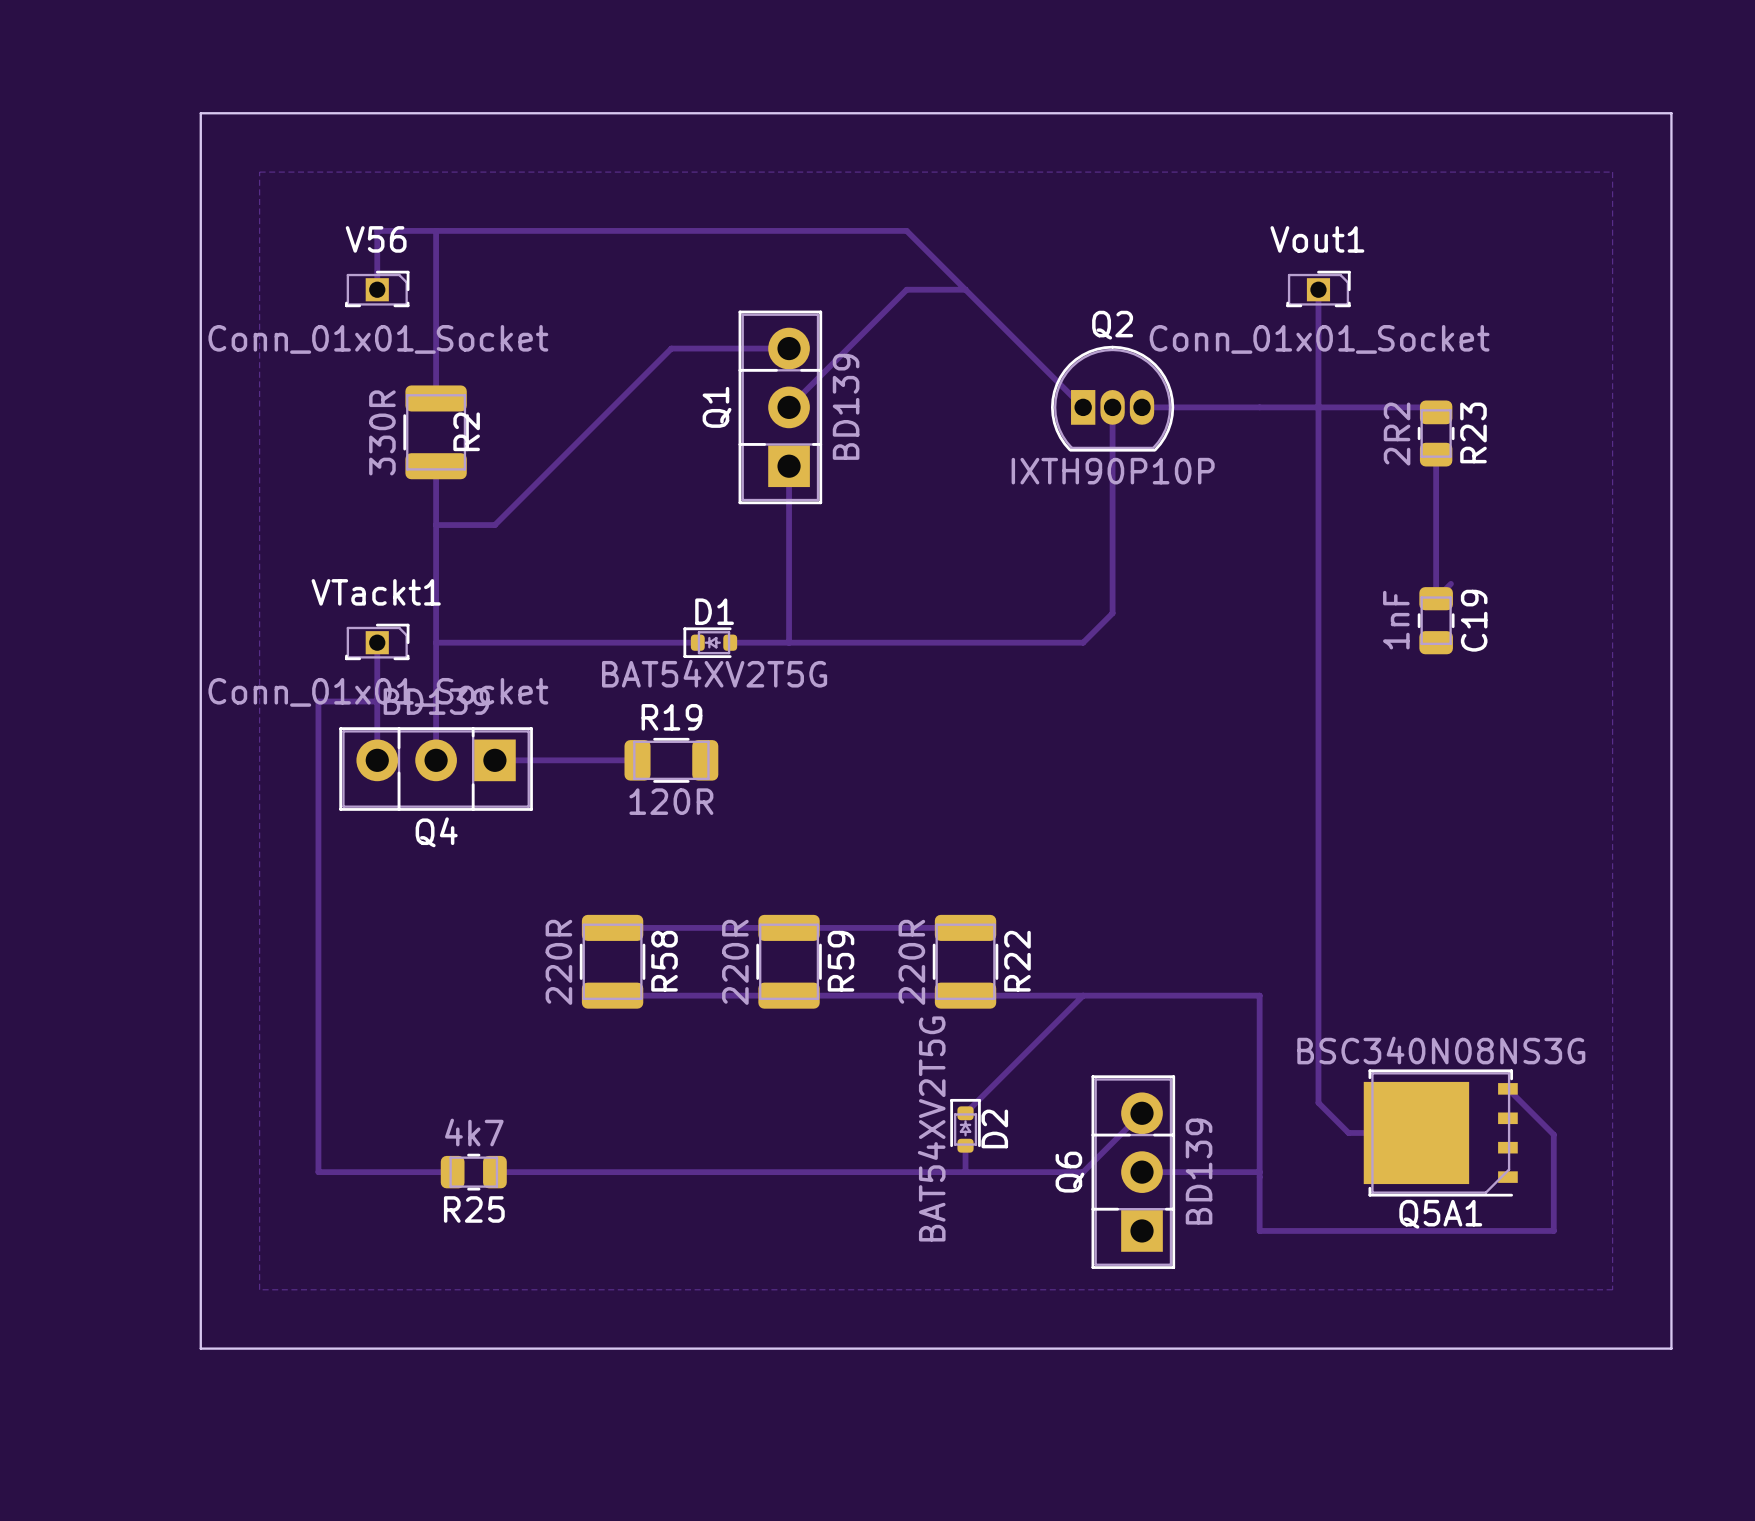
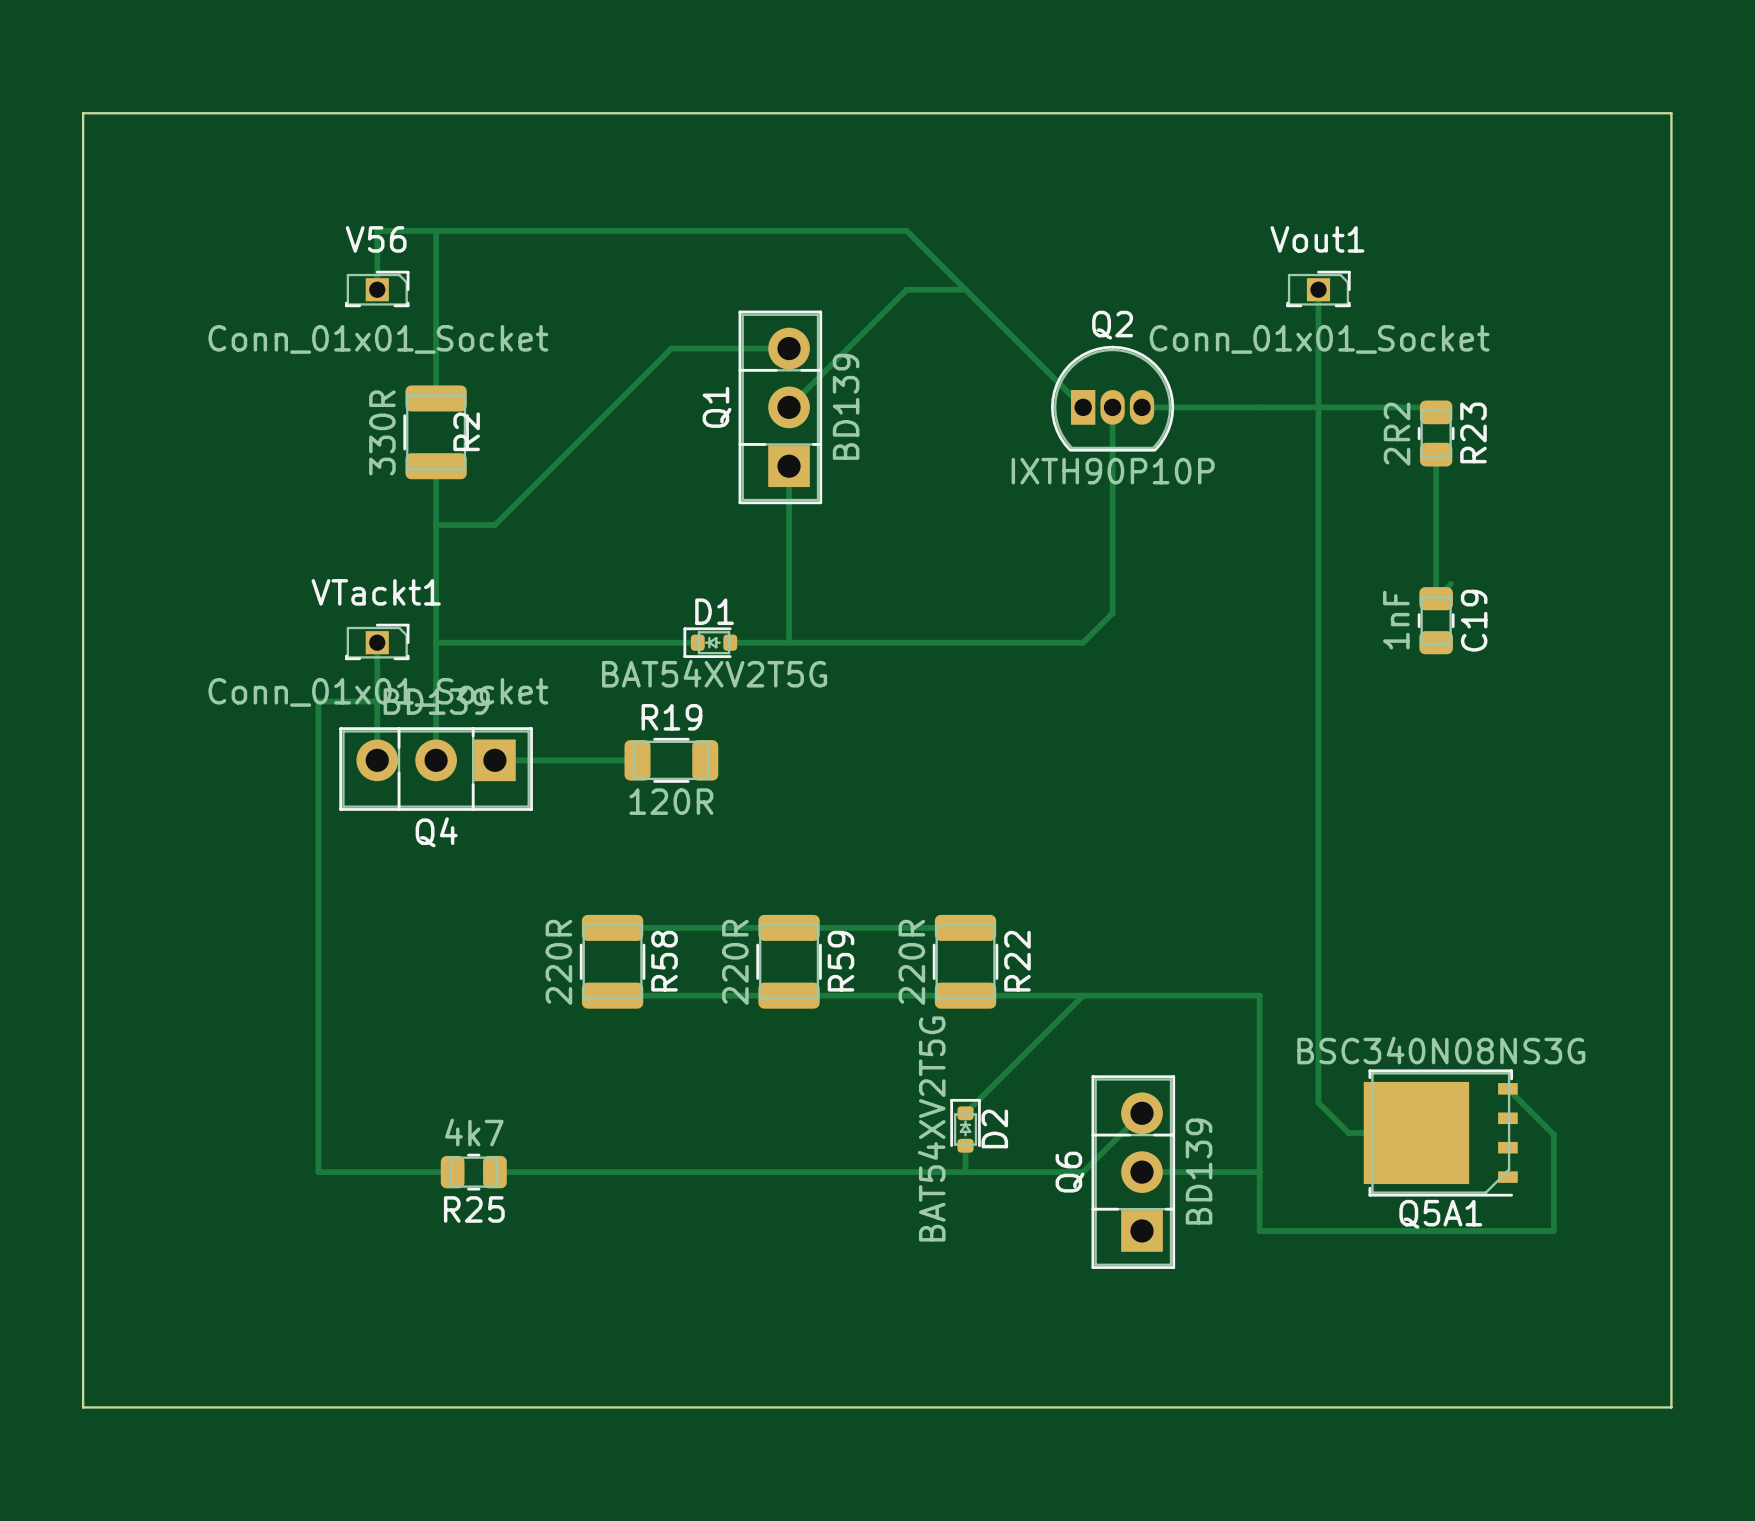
board edge: (200, 113) (200, 1348) (1671, 1348) -> (200, 113) (83, 113) (83, 1407) (1671, 1407) (1671, 1348)
zone outline: (259, 172) (1612, 172) (1612, 1289) (259, 1289) (259, 172) -> none

